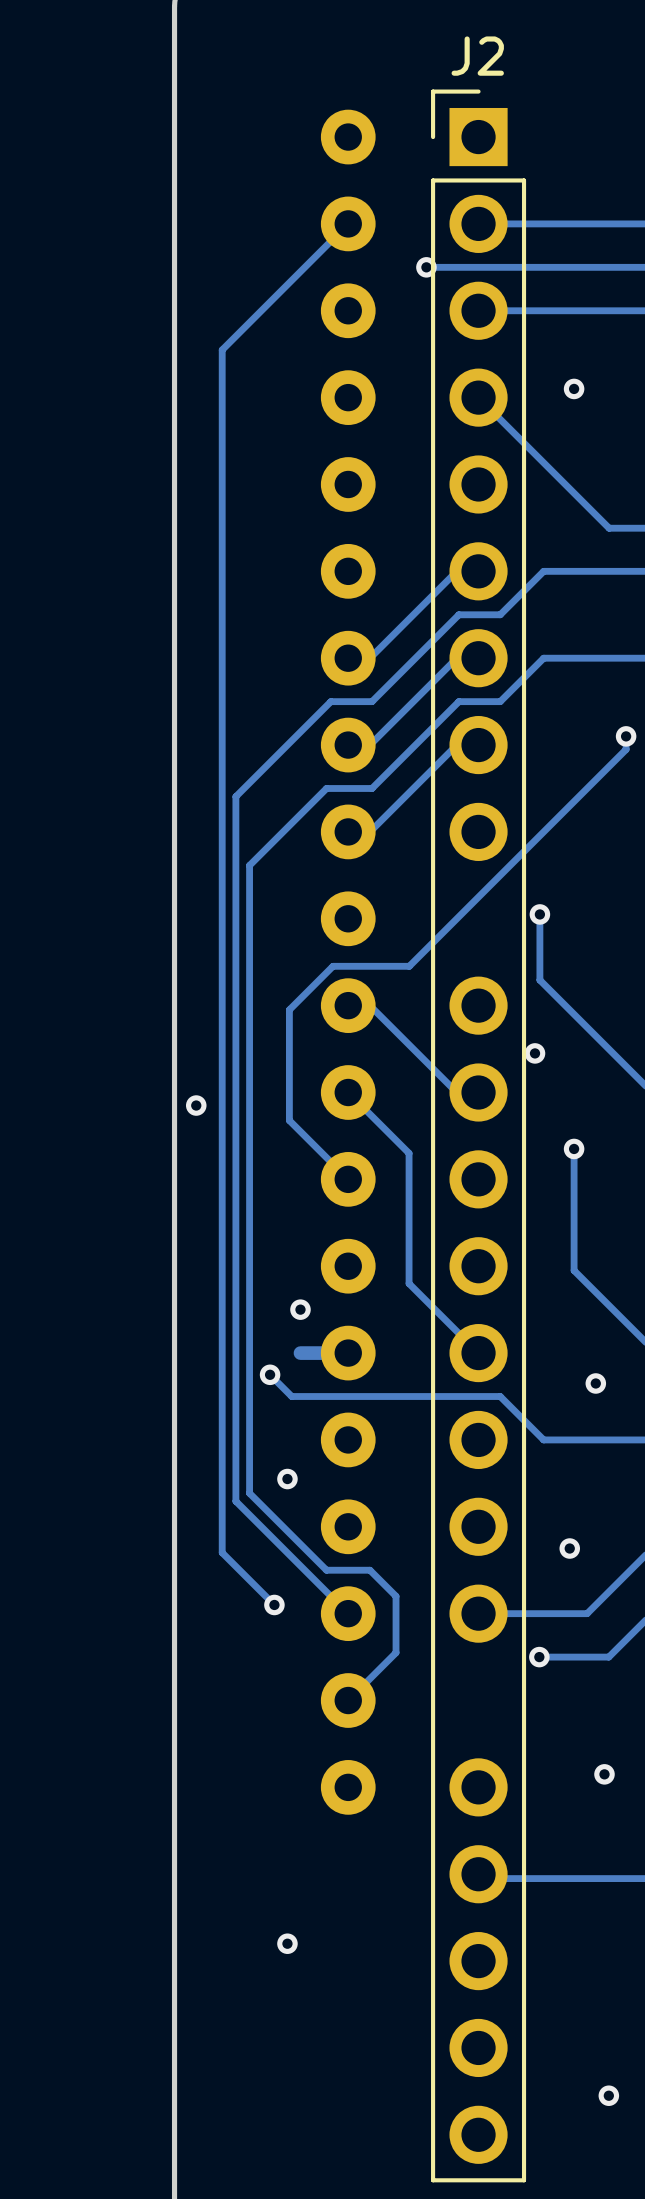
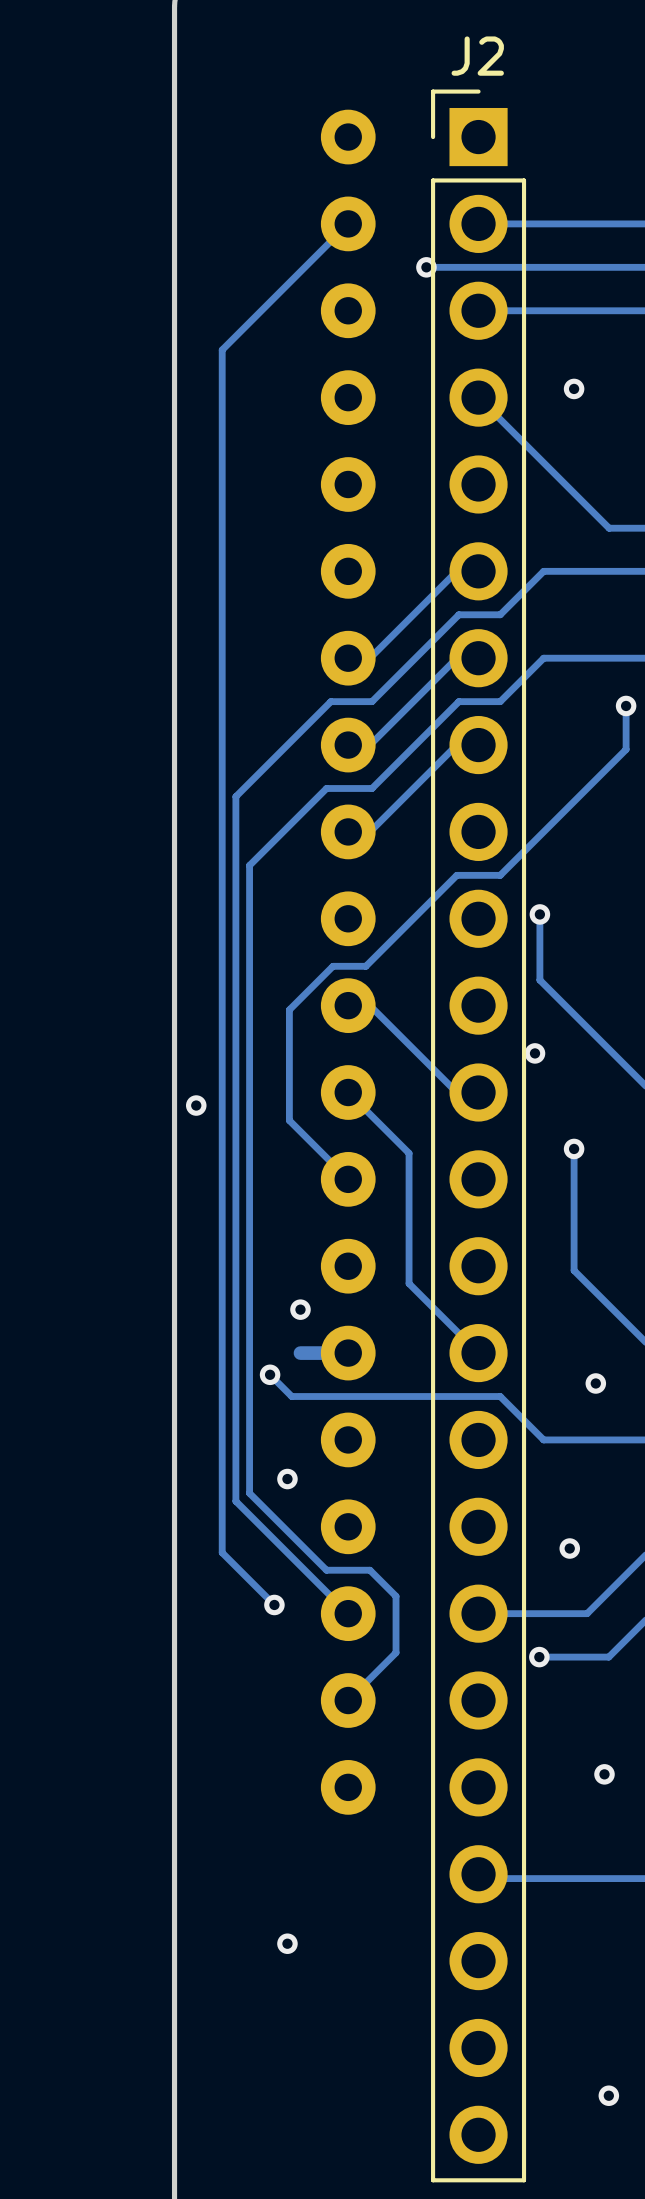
J2 footprint: [431, 89, 527, 2183] -> [431, 89, 527, 2183]
track: none -> (626, 705) (626, 736)
via position: (626, 736) -> (626, 705)
track: (500, 875) (409, 966) (365, 966) -> (500, 875) (456, 875) (365, 966)

